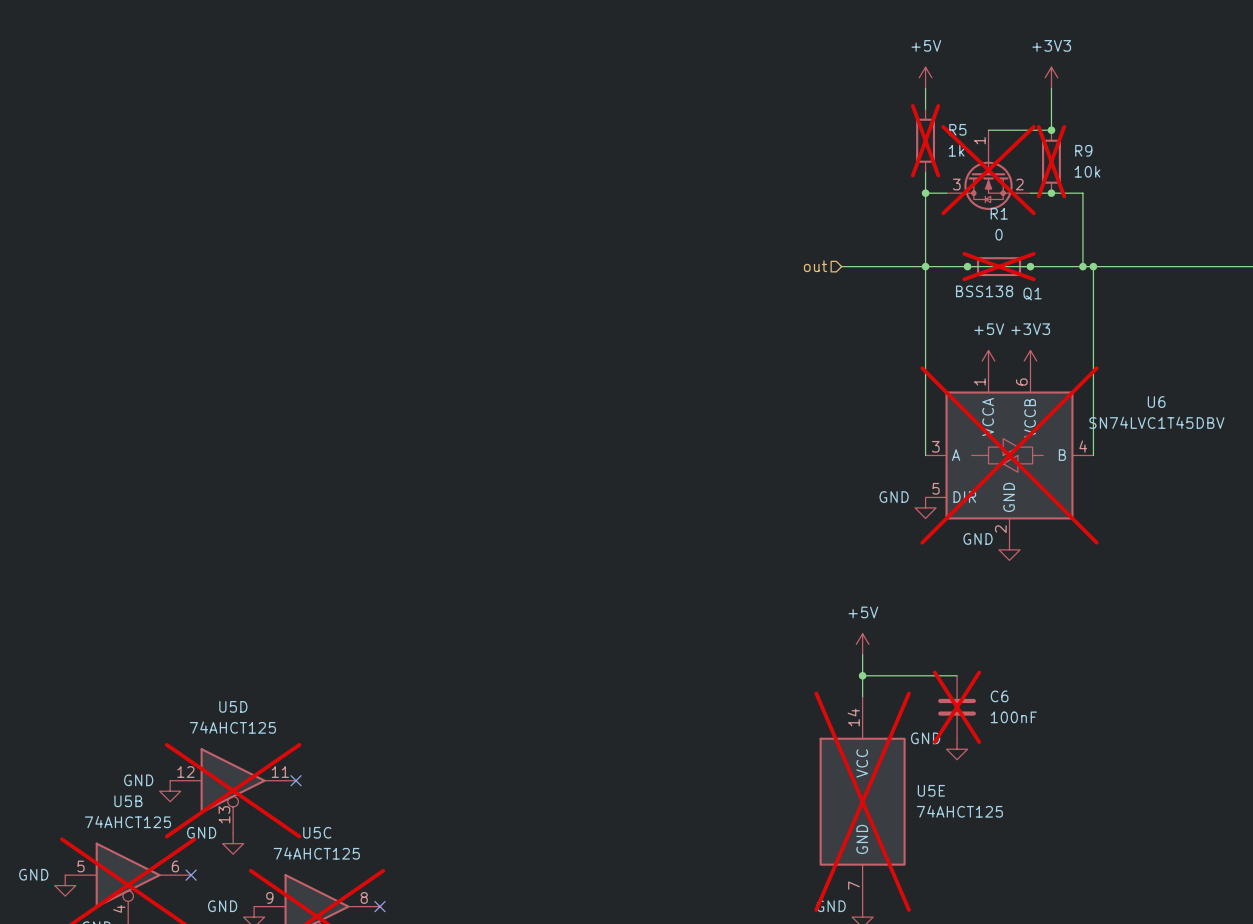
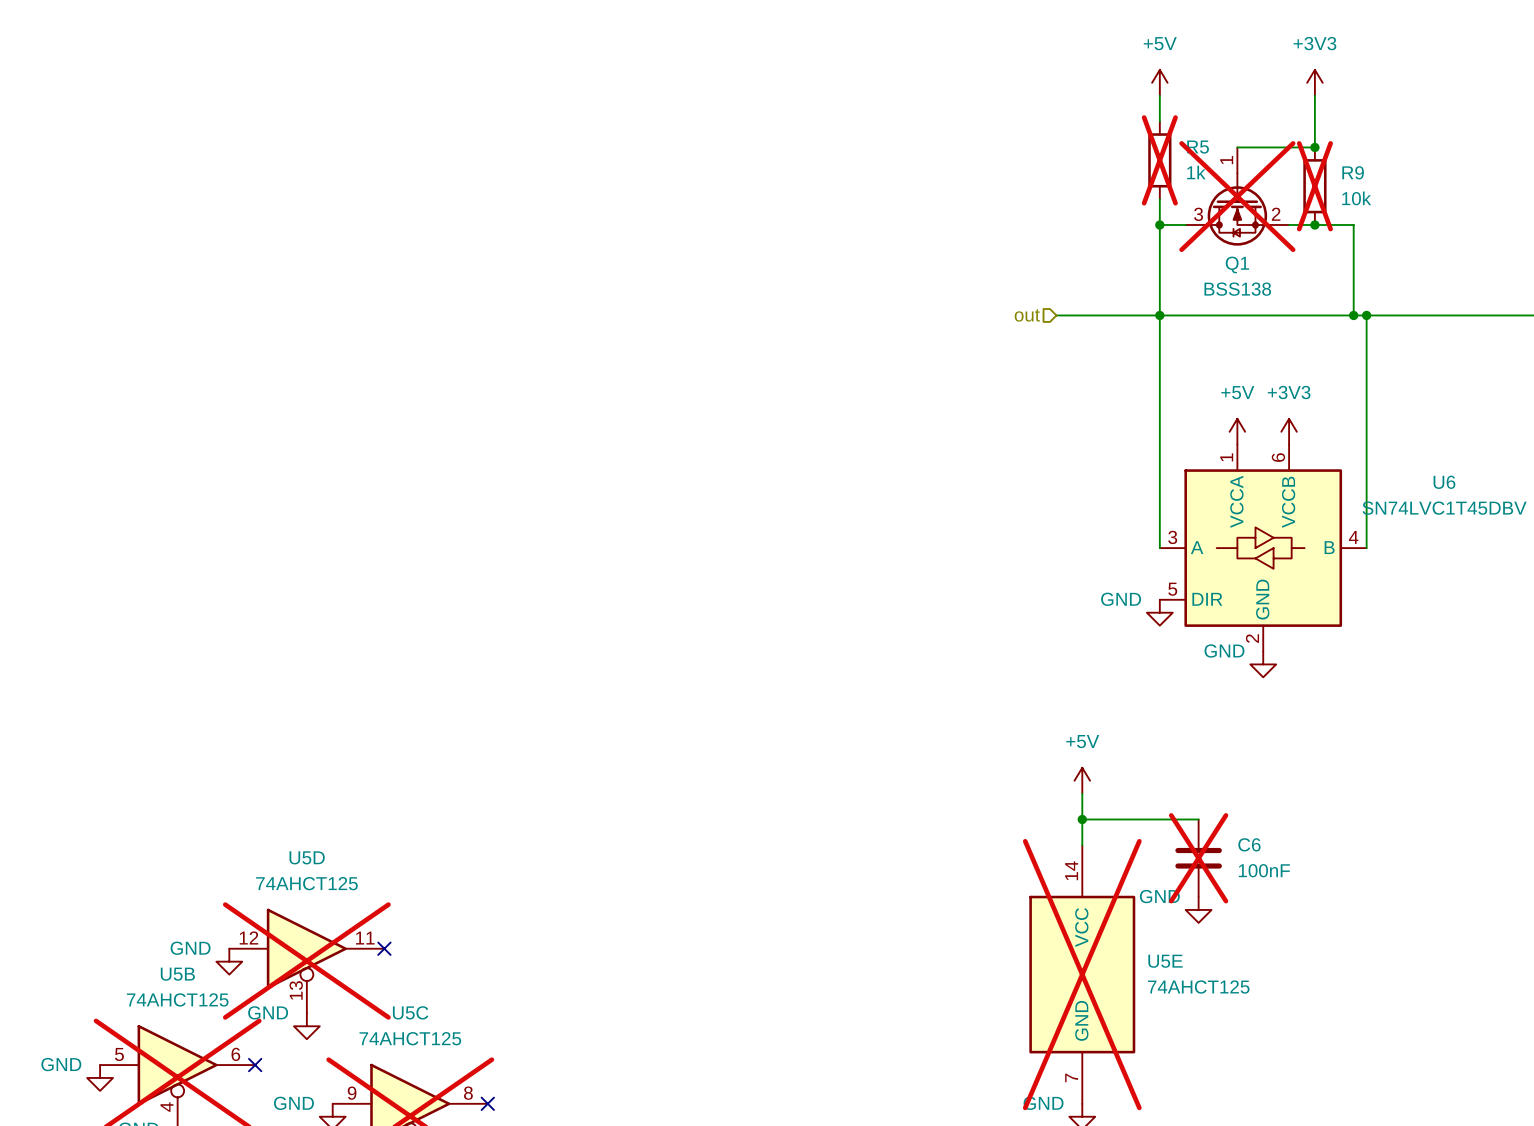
junction: (967, 266) -> none
R1: 0 (999, 266) -> none
junction: (1030, 266) -> none
Q1 value position: BSS138 (984, 291) -> BSS138 (1237, 289)
Q1 name position: Q1 (1032, 294) -> Q1 (1237, 264)
U6 do-not-place cross: (1009, 455) -> none

